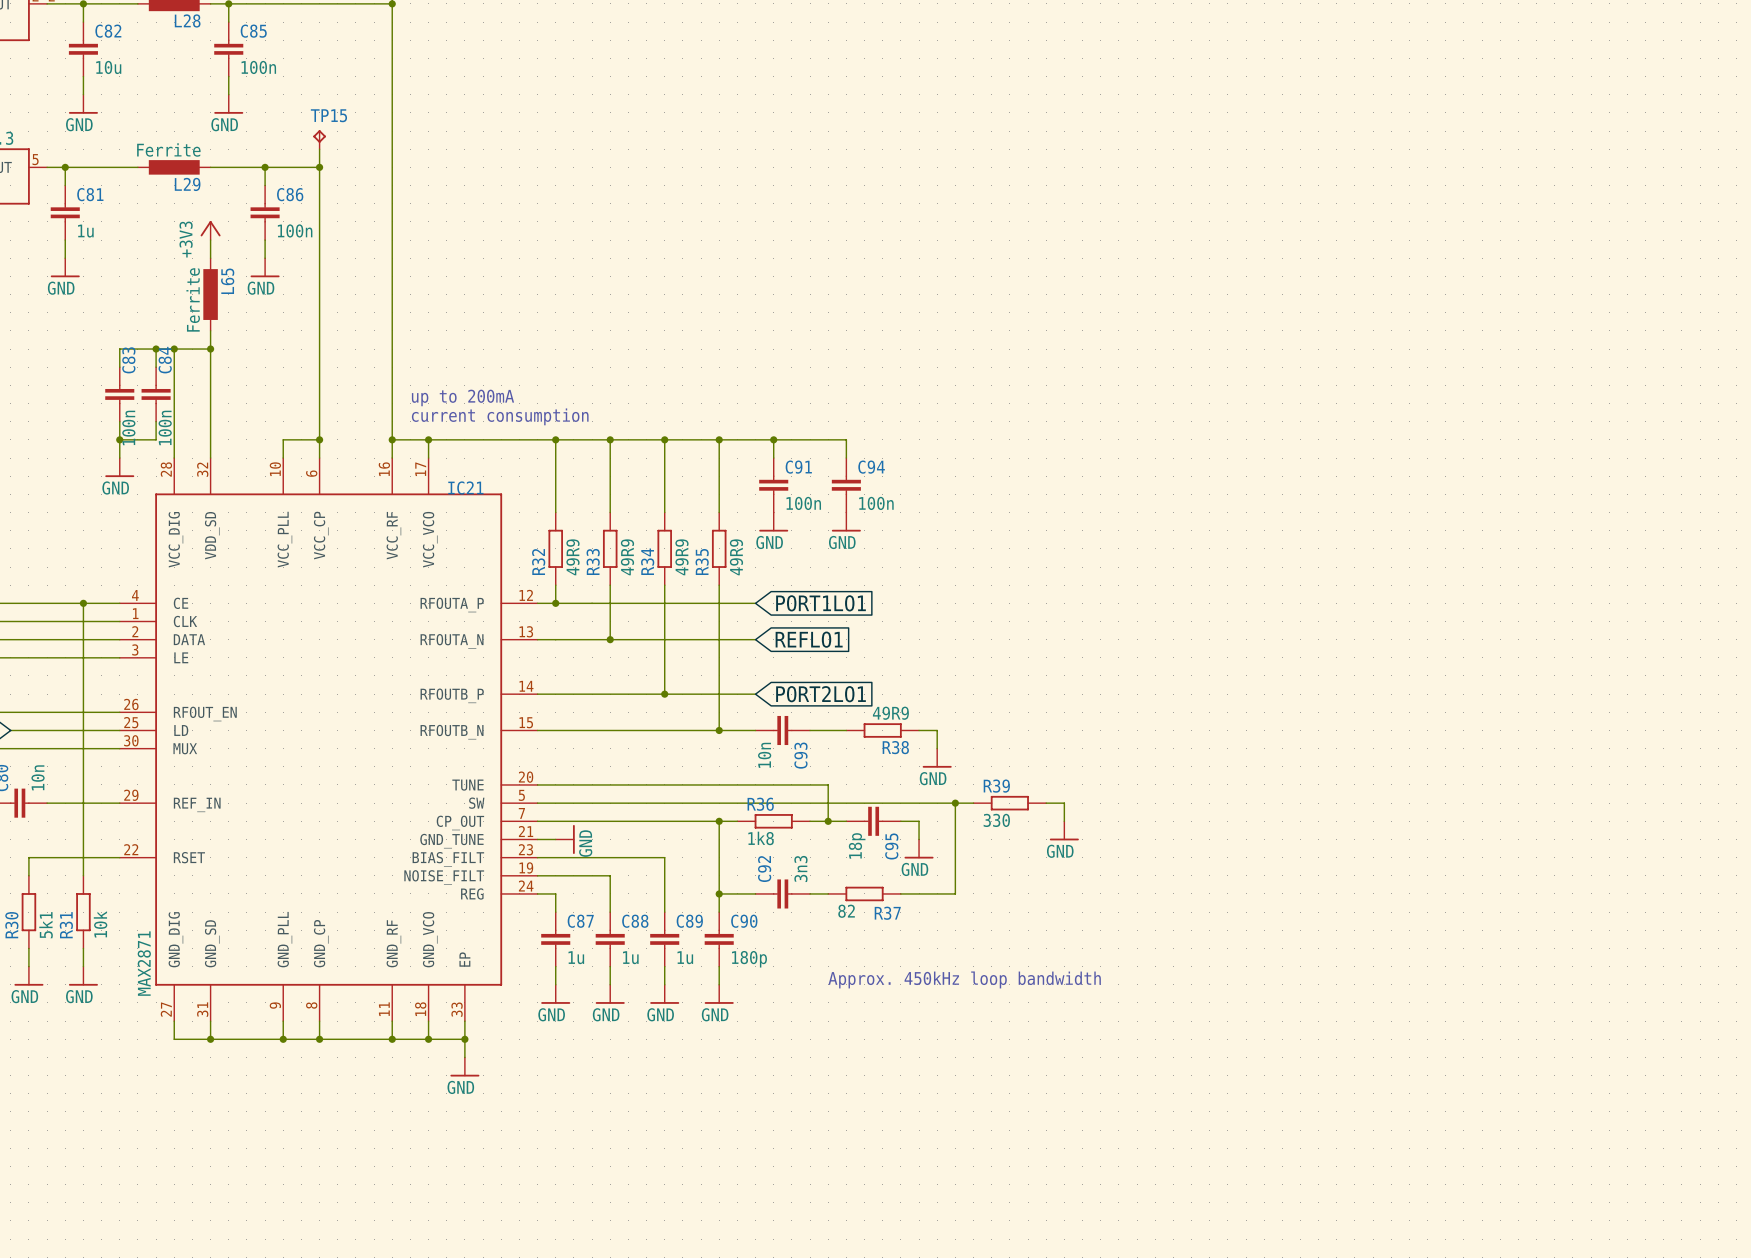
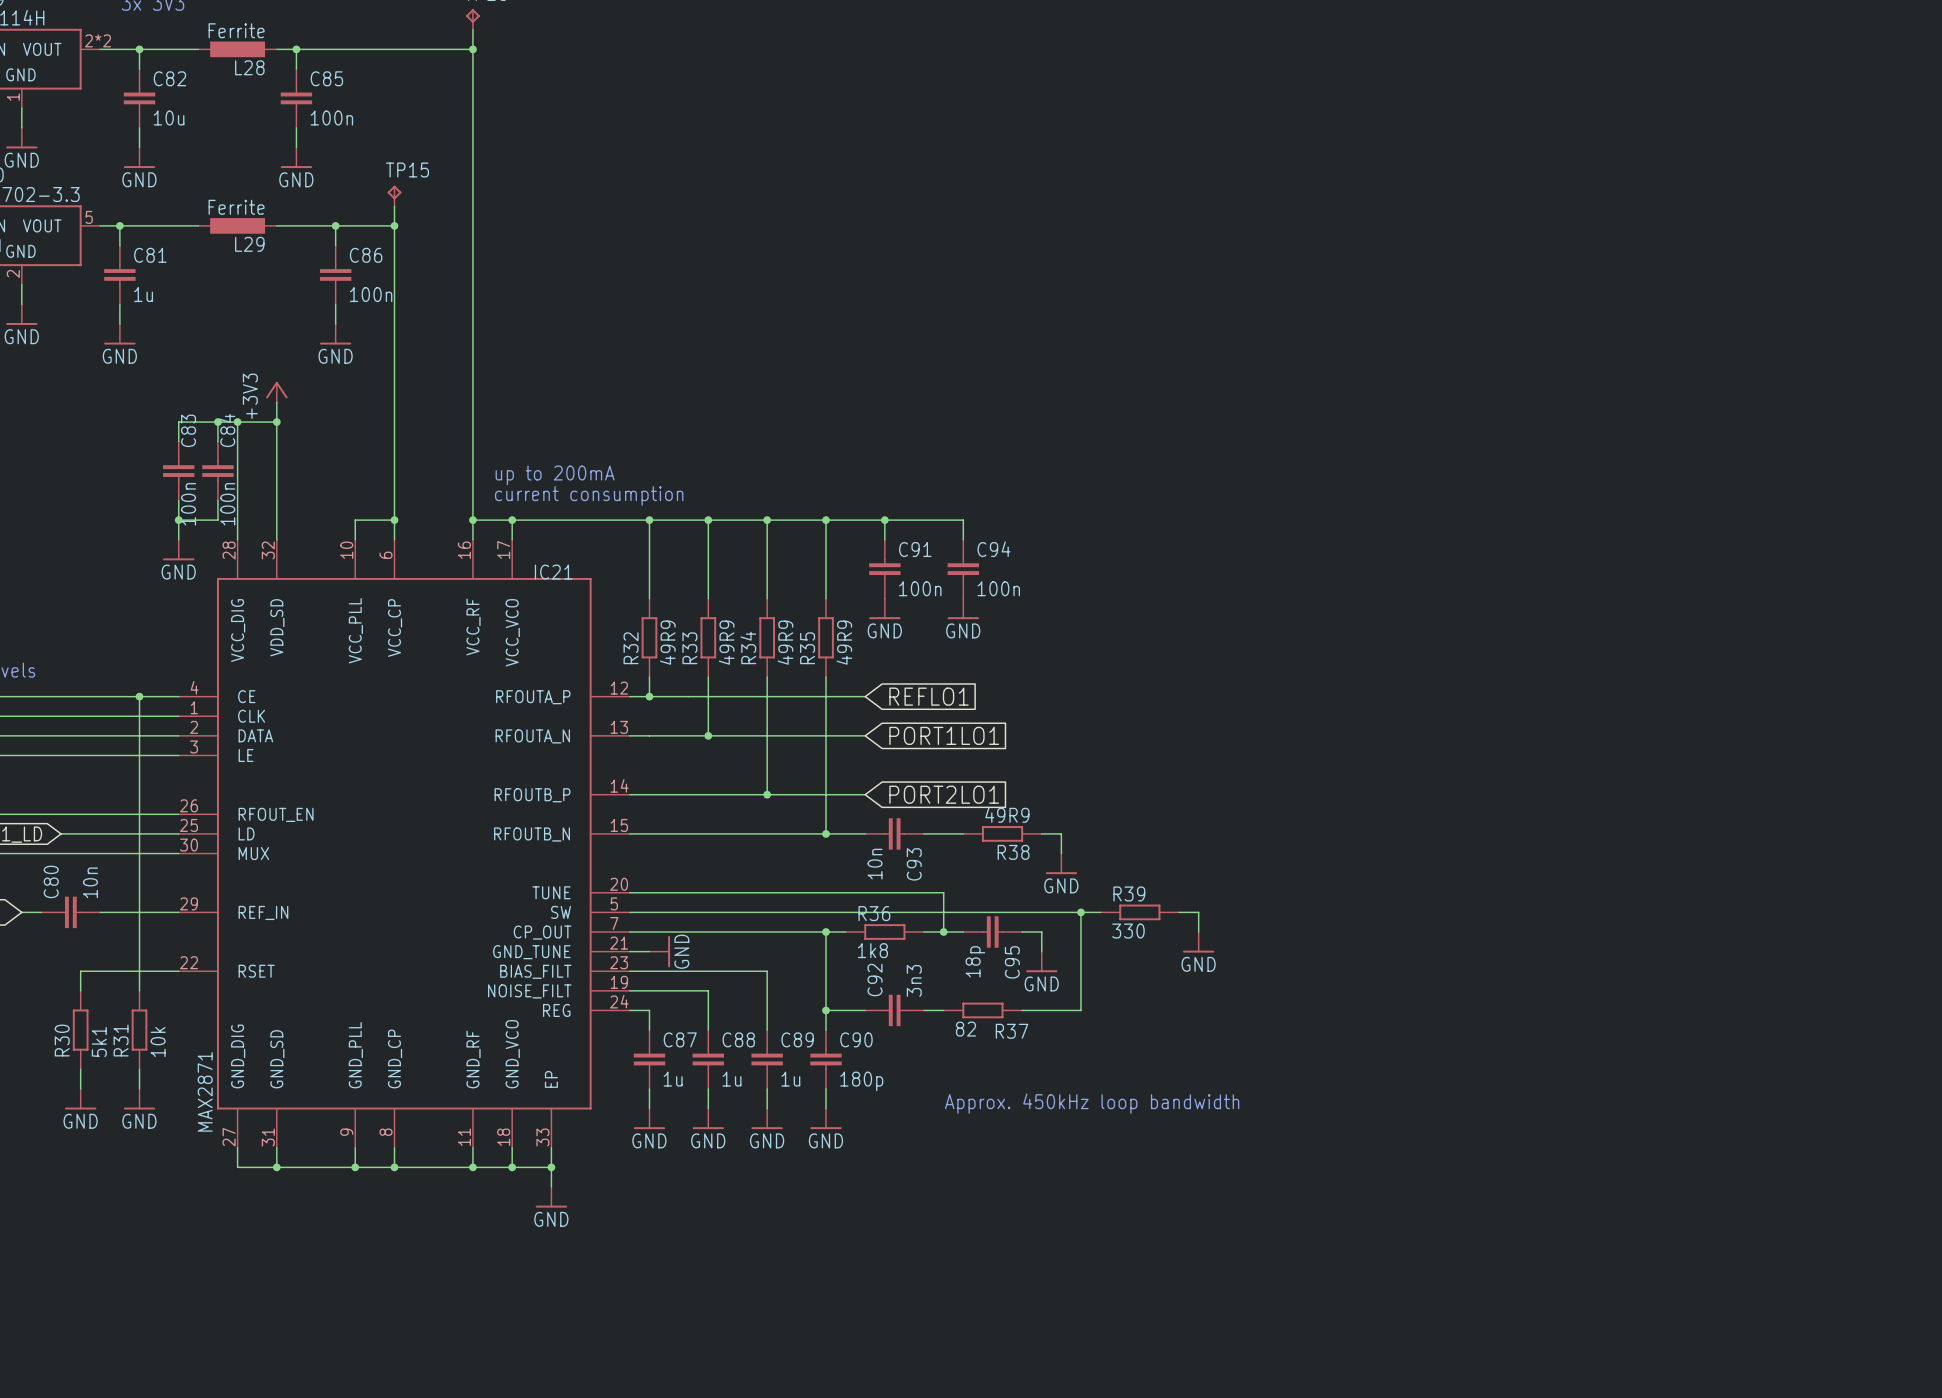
power symbol position: +3V3 (210, 230) -> +3V3 (276, 392)
wire: (210, 240) (210, 258) -> none
L65: Ferrite (210, 294) -> none
global label: PORT1LO1 (821, 603) -> REFLO1 (929, 696)
global label: REFLO1 (809, 639) -> PORT1LO1 (944, 735)

